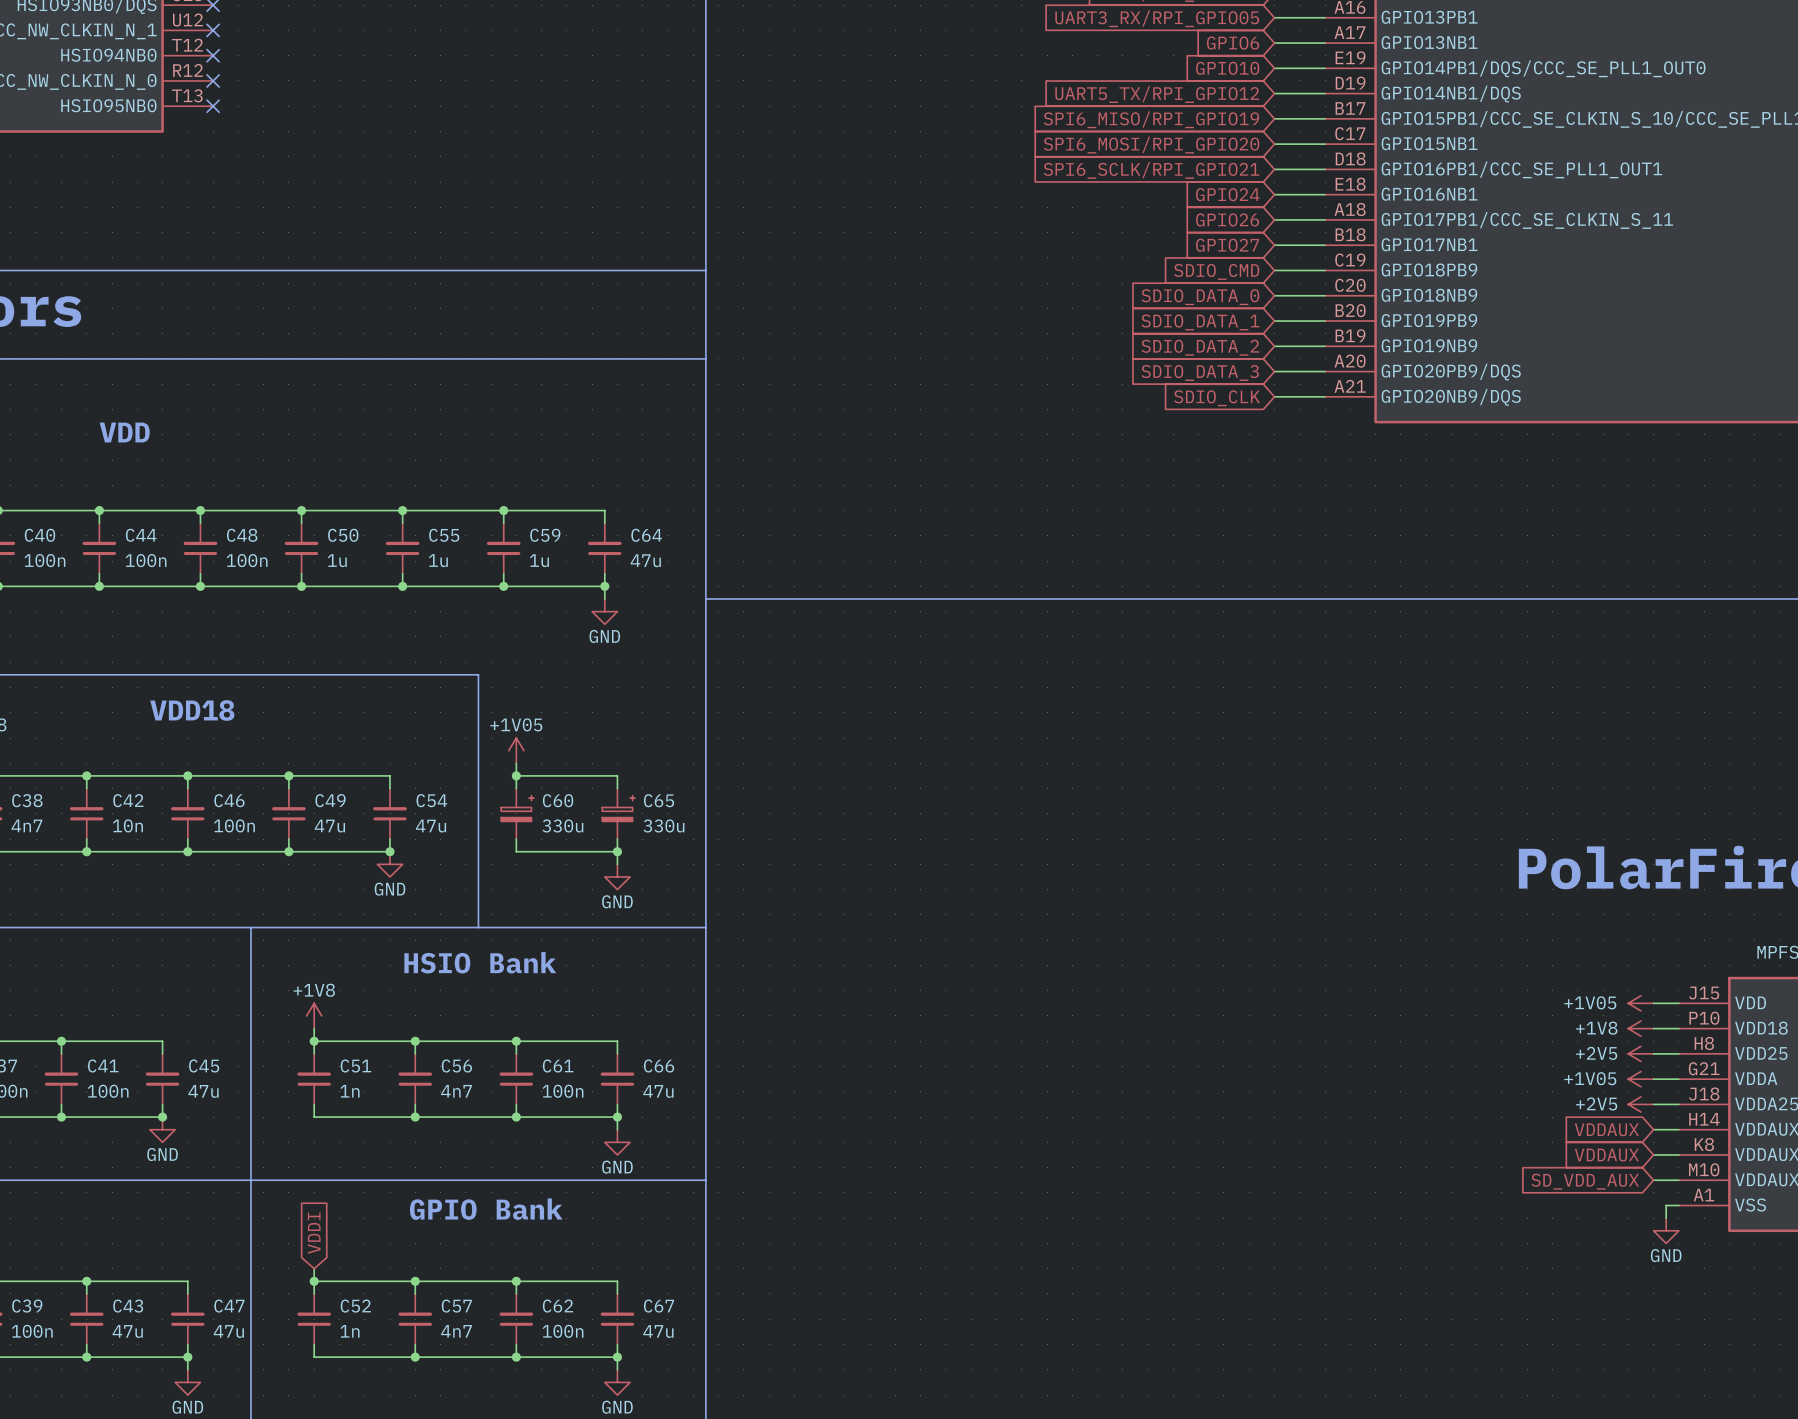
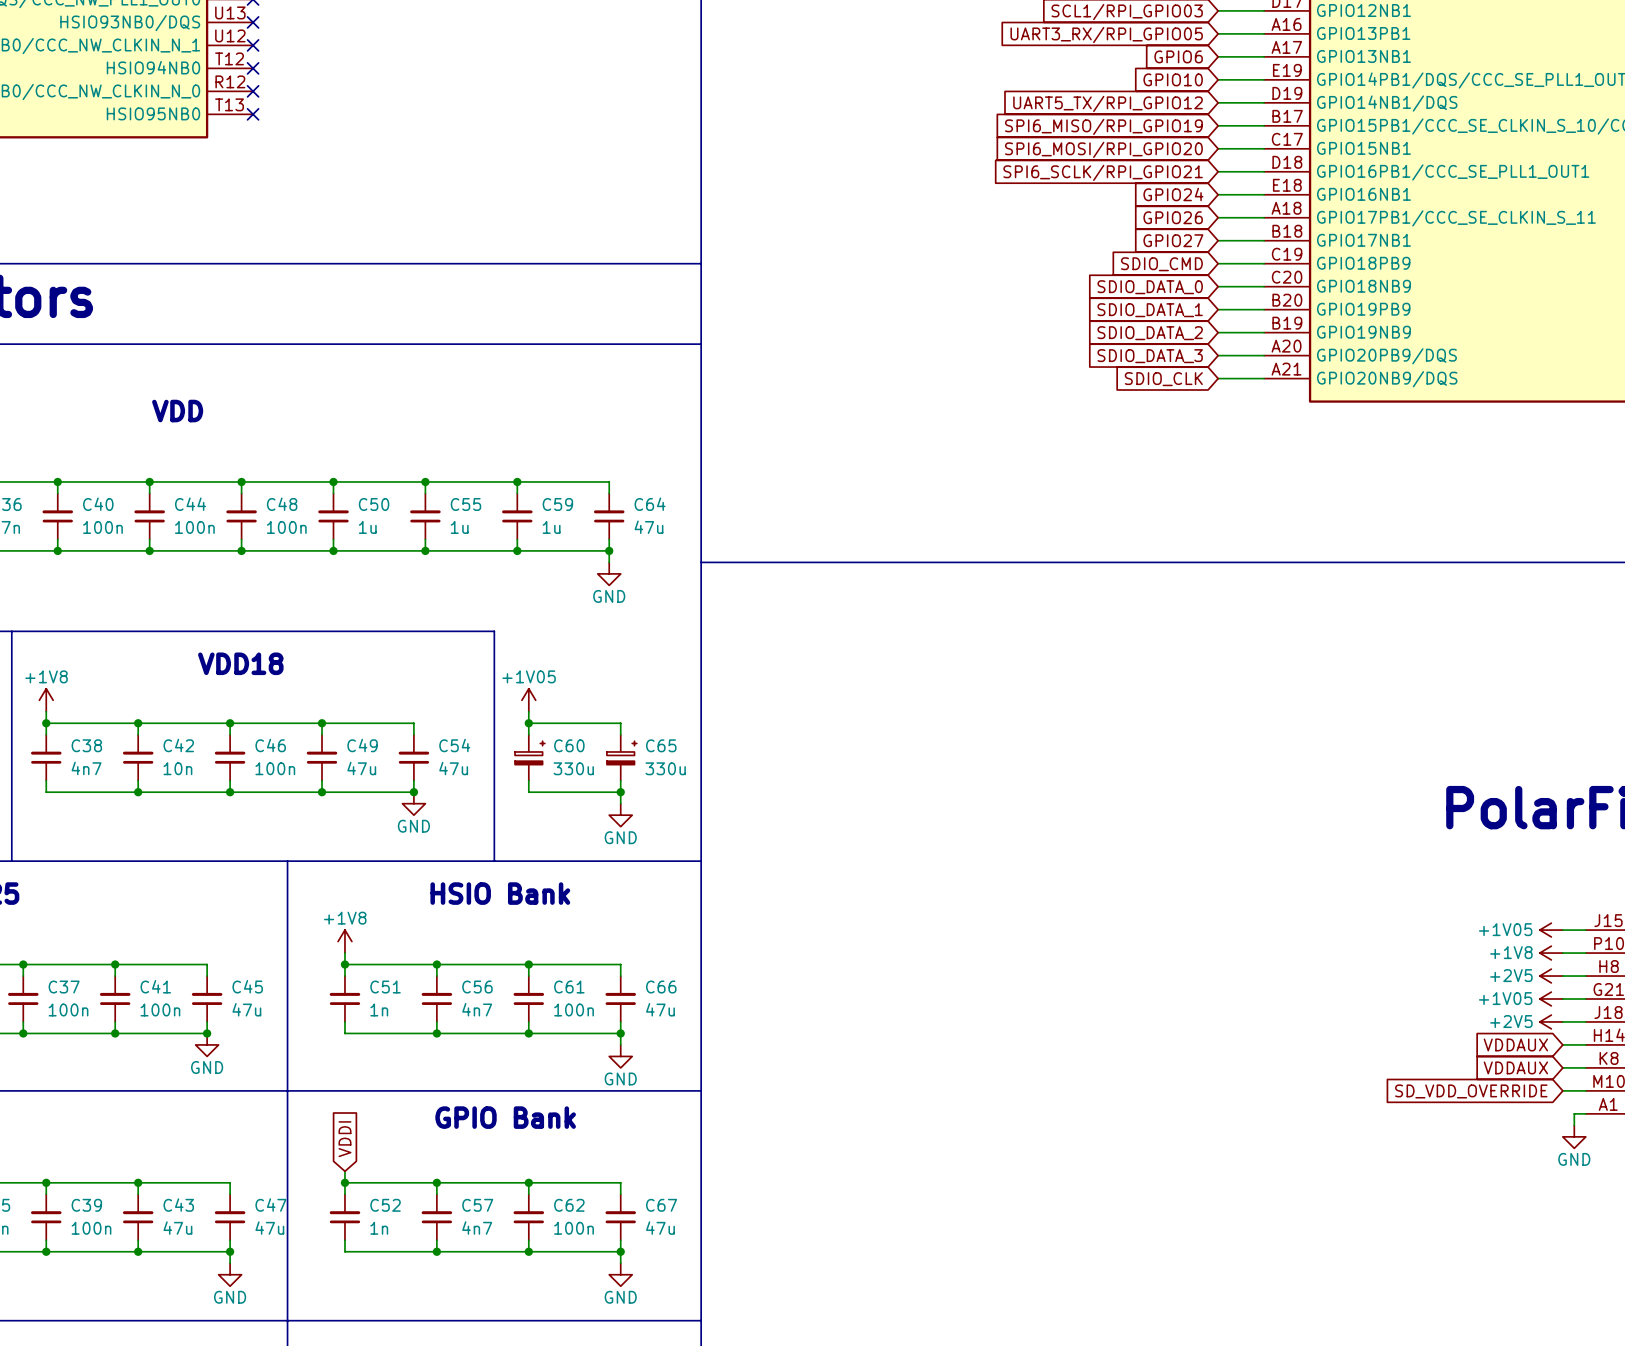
global label: SD_VDD_AUX (1585, 1181) -> SD_VDD_OVERRIDE (1471, 1091)

